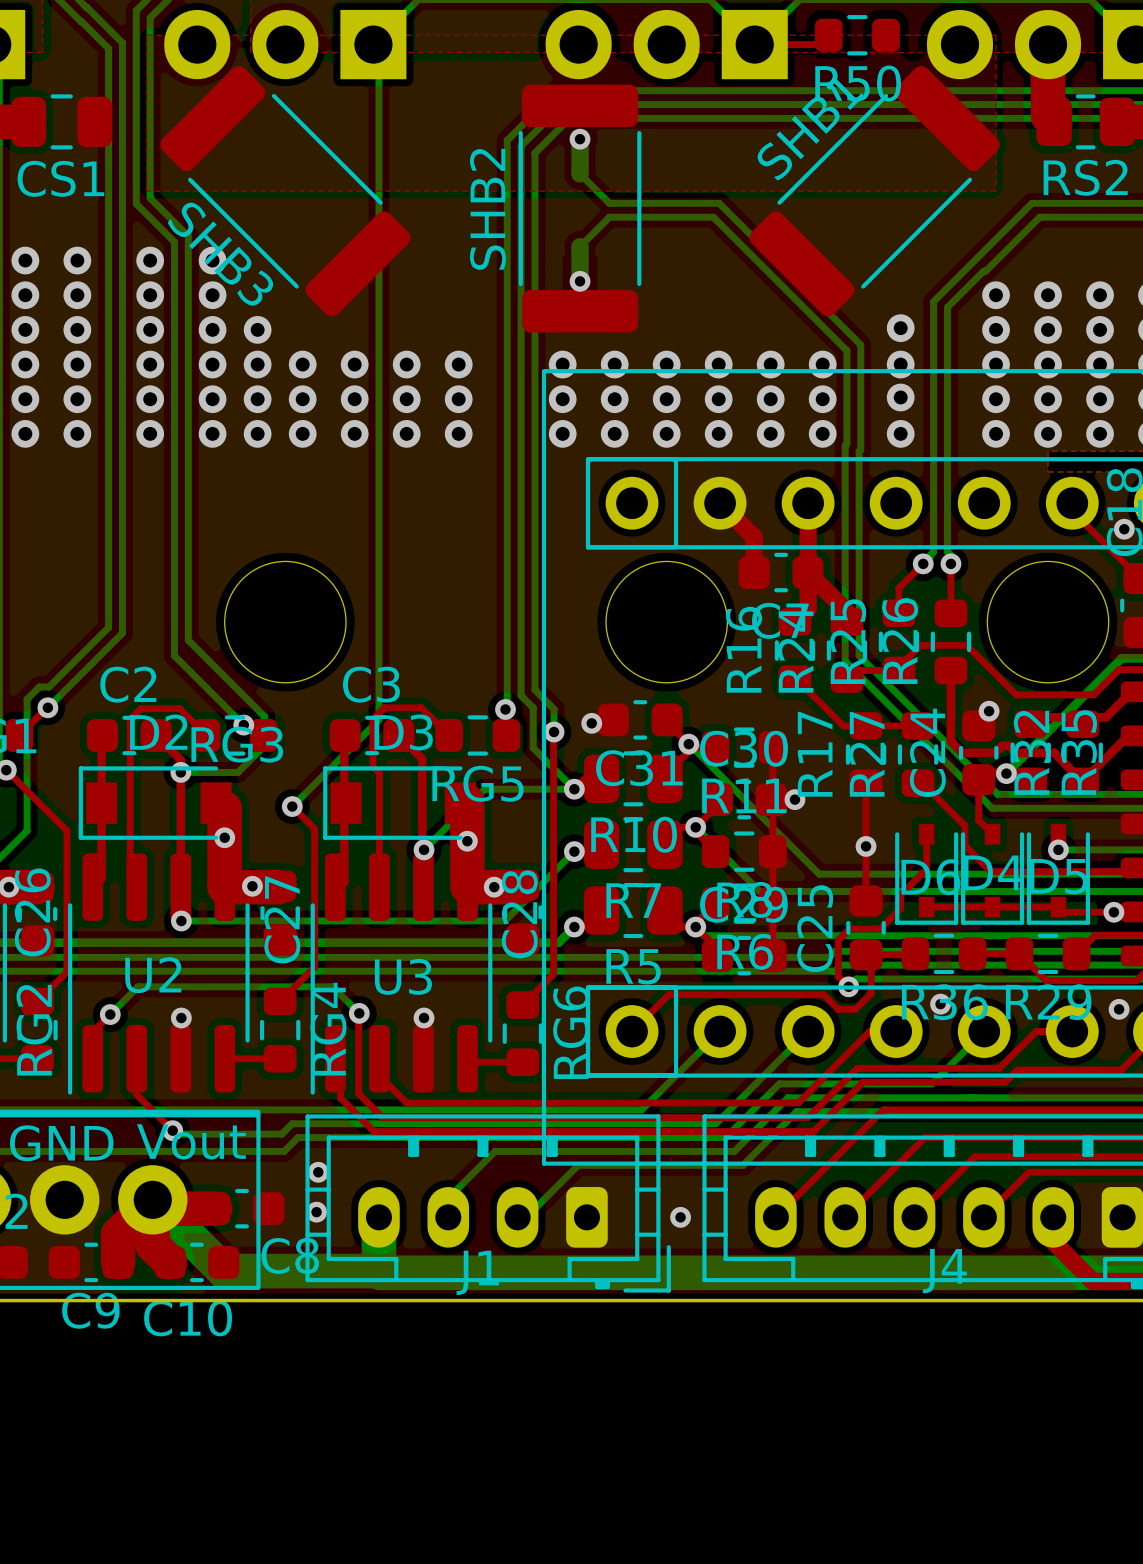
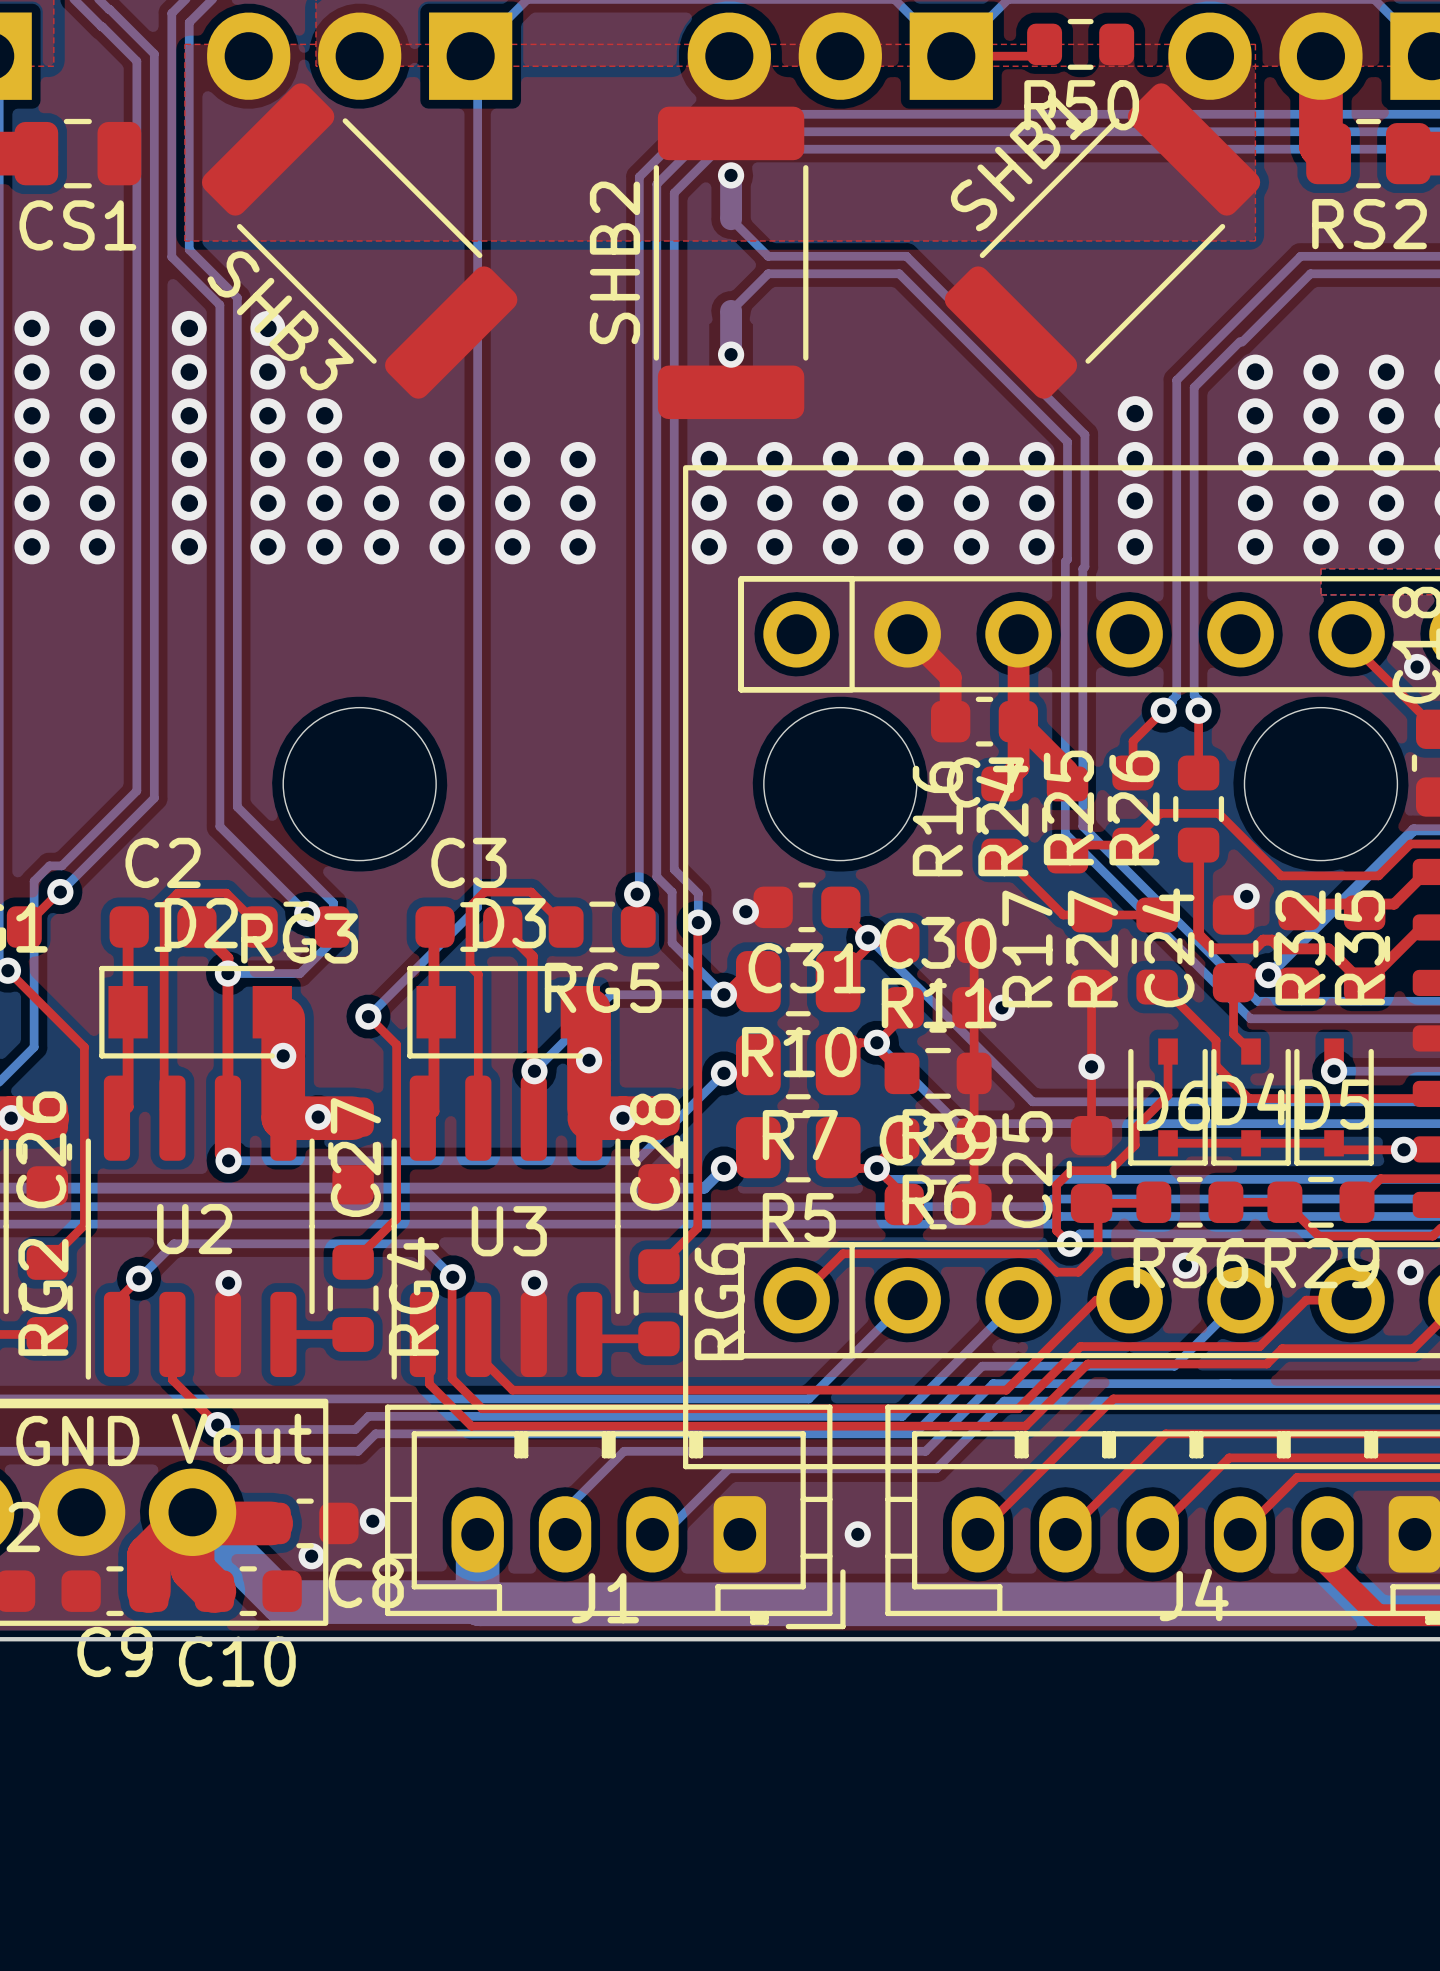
via: (318, 1172) -> none
via: none -> (372, 1521)
via: (316, 1212) -> none
via: none -> (311, 1556)

